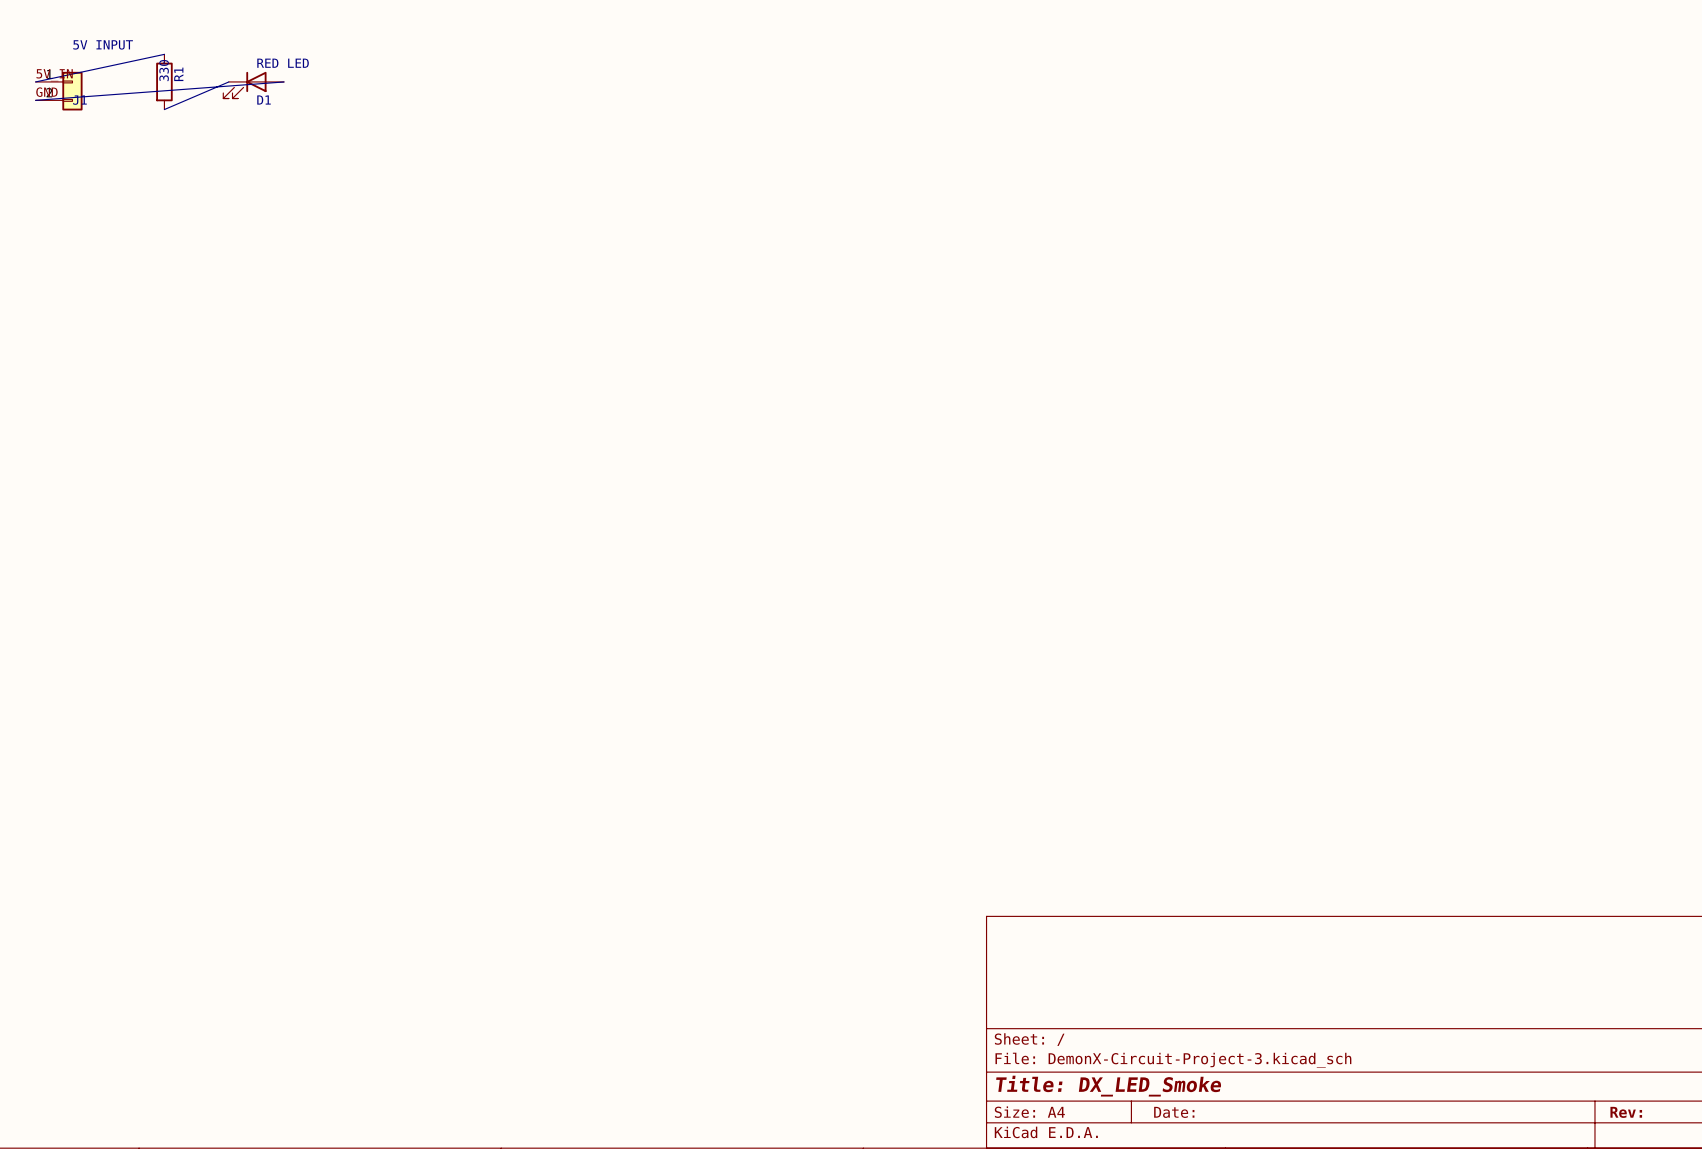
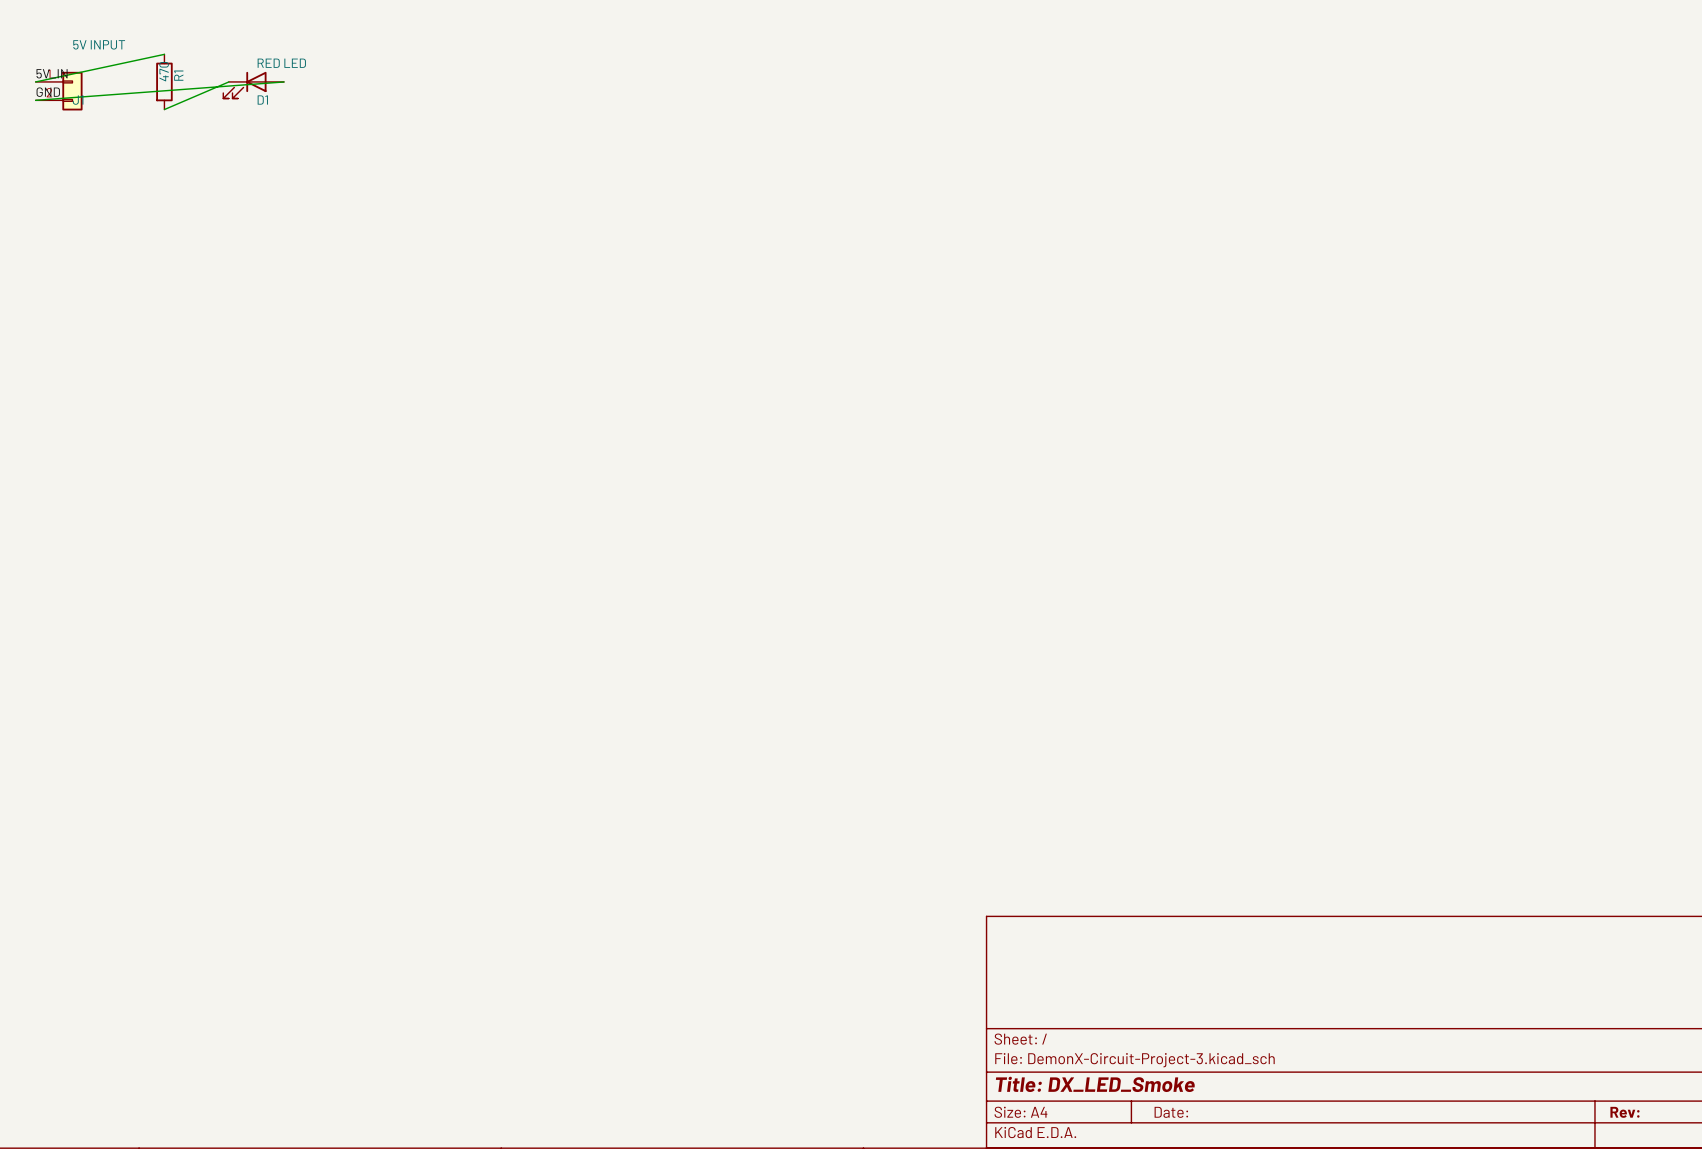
R1 value: 330 (164, 70) -> 470 (164, 71)

